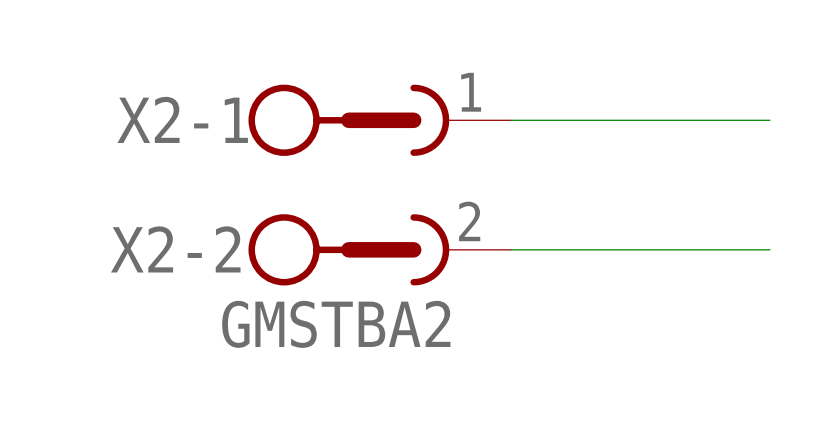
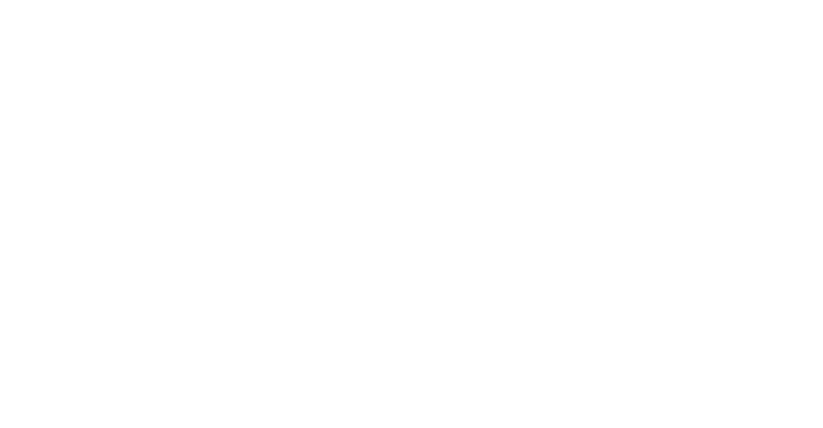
X2-1: (379, 120) -> none
wire: (510, 120) (769, 120) -> none
X2-2: GMSTBA2 (379, 249) -> none
wire: (510, 249) (769, 249) -> none

